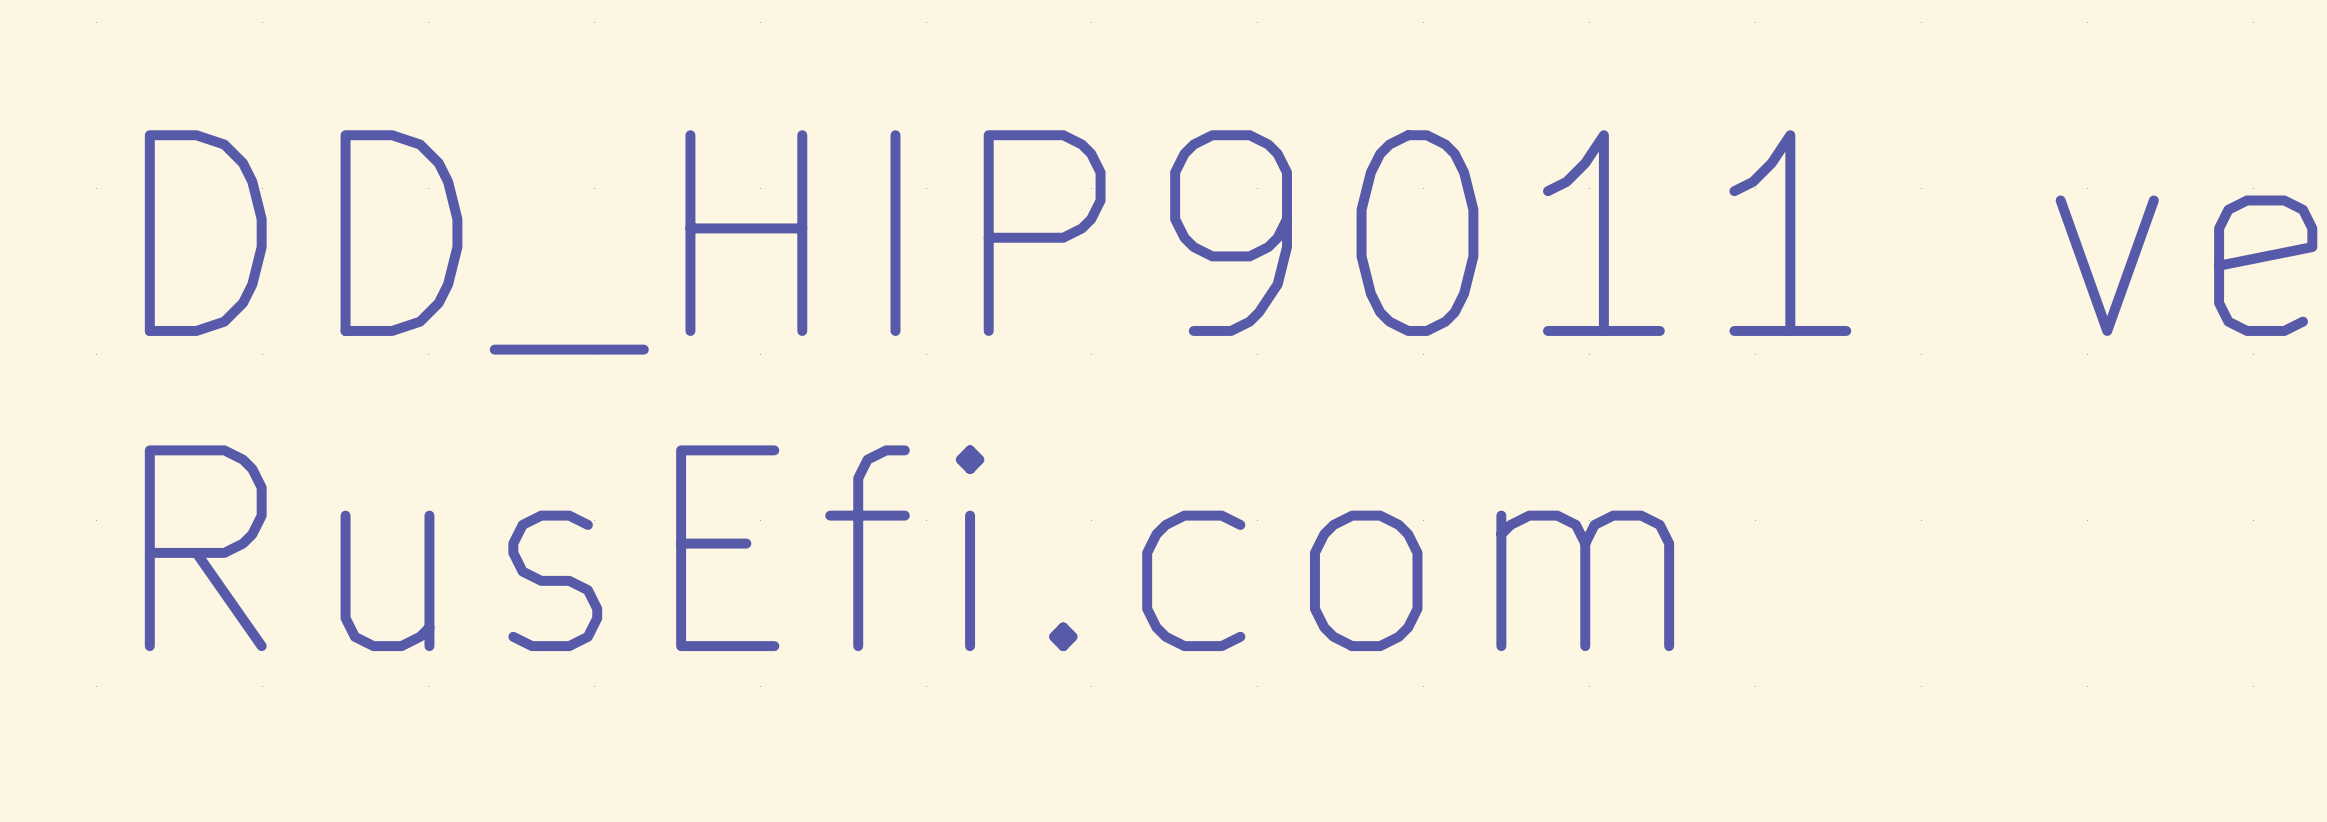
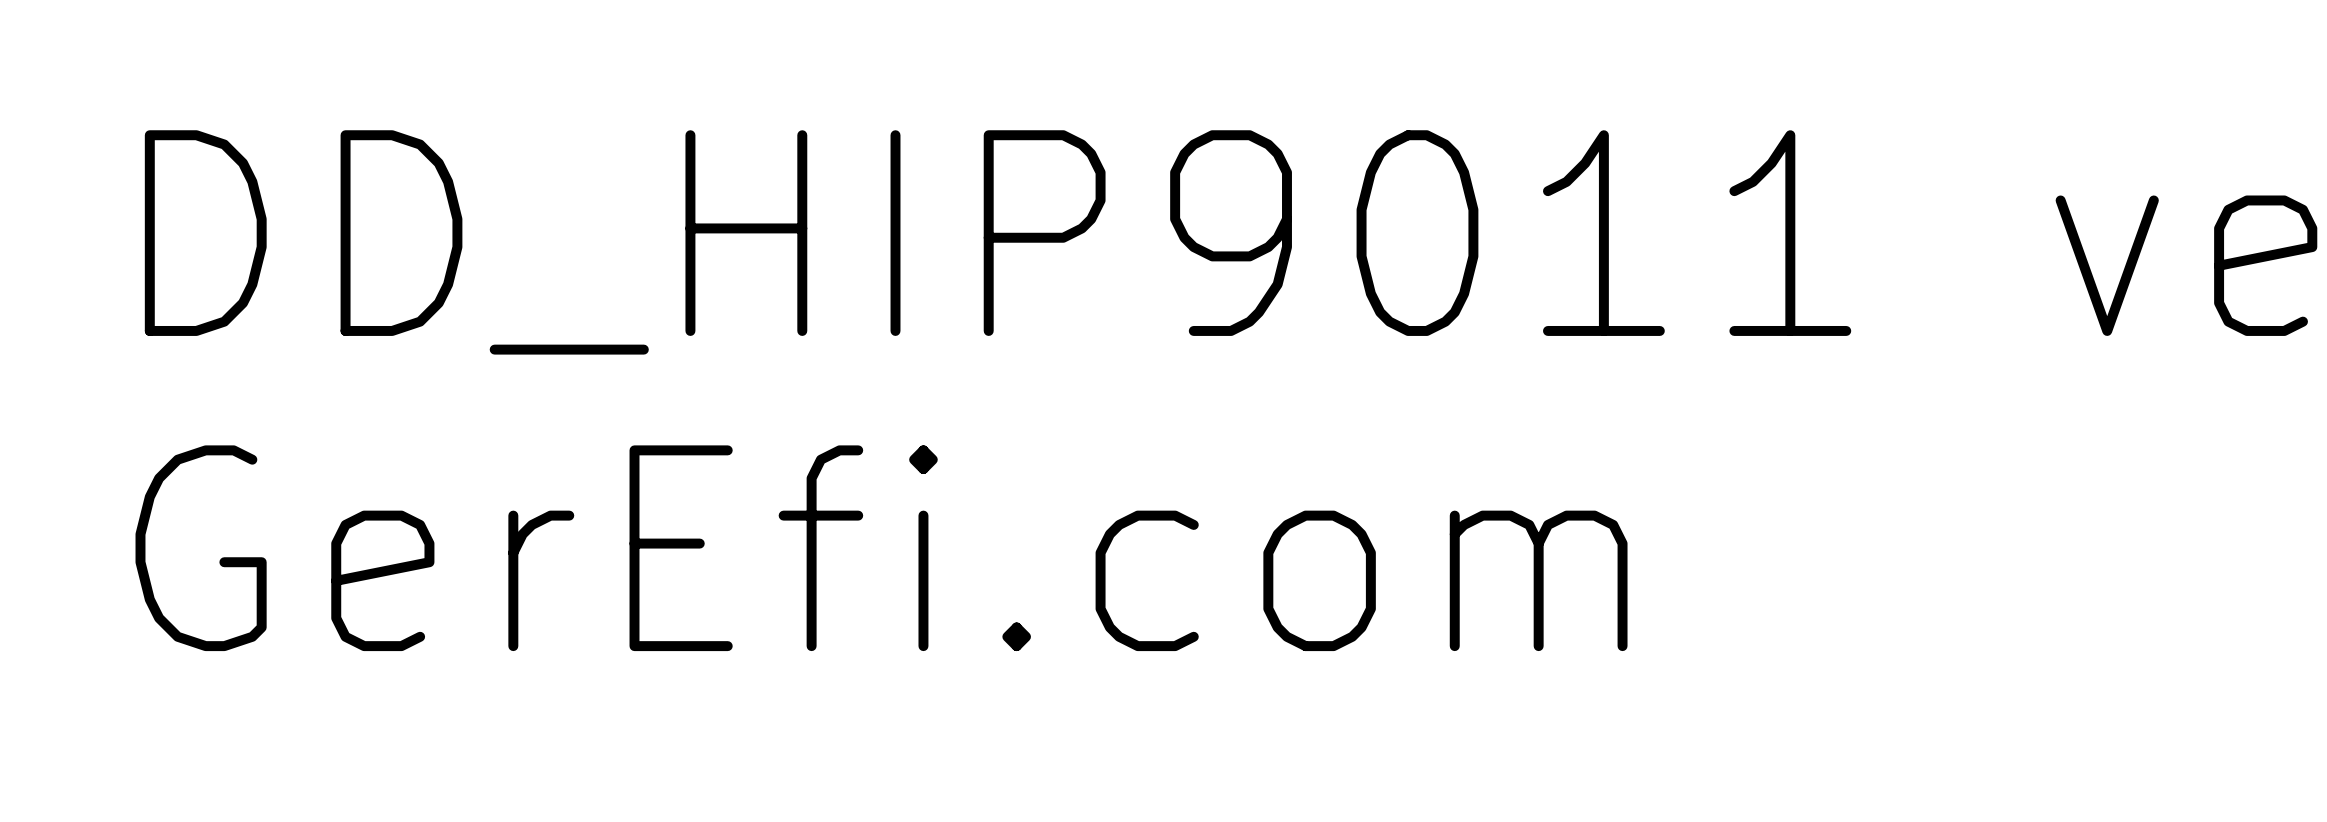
text: RusEfi.com (909, 548) -> GerEfi.com (881, 548)

